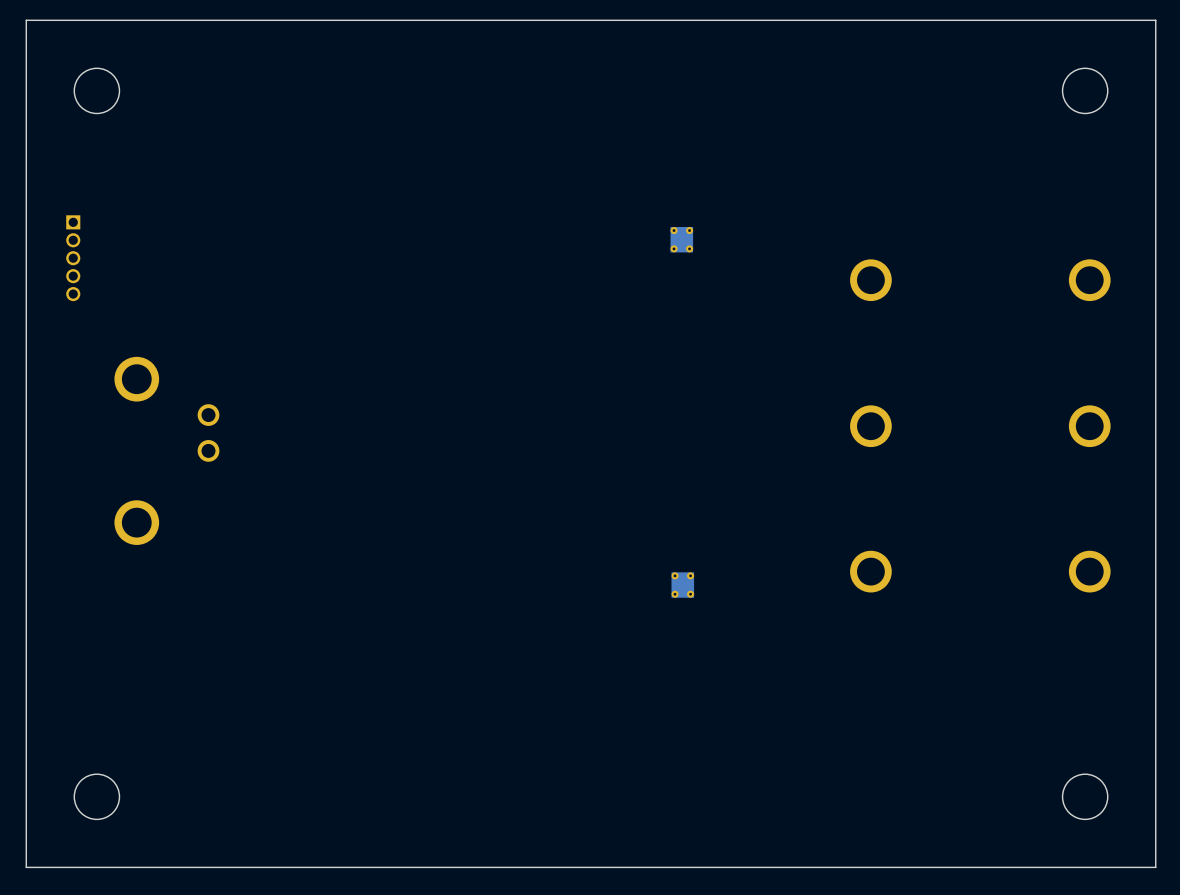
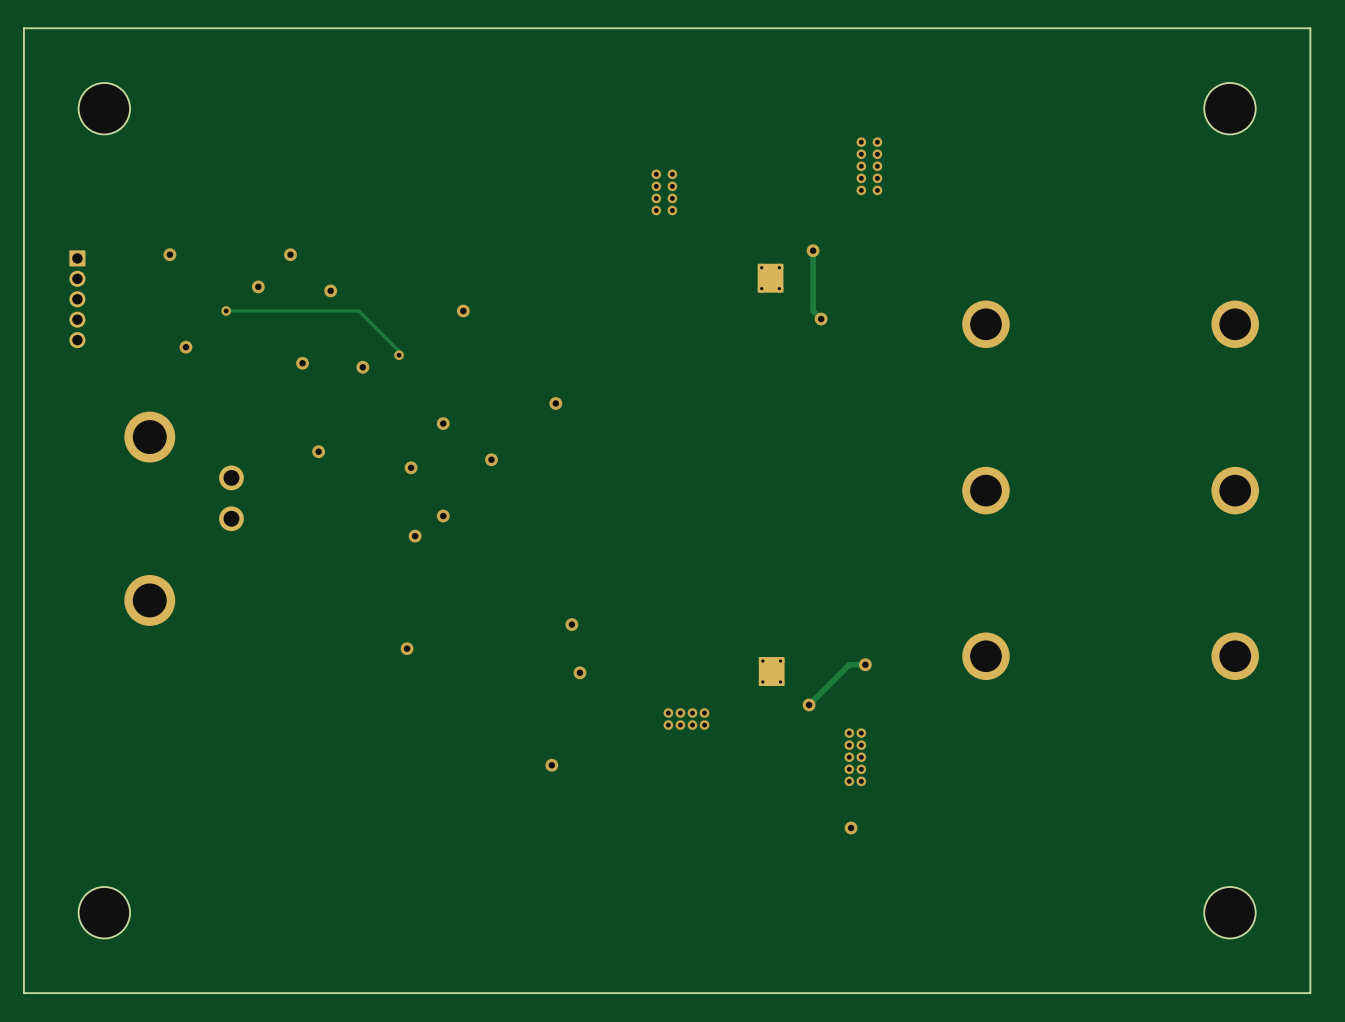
via: none -> (861, 142)
via: none -> (877, 142)
via: none -> (861, 154)
via: none -> (877, 154)
via: none -> (861, 166)
via: none -> (877, 166)
via: none -> (656, 174)
via: none -> (672, 174)
via: none -> (861, 178)
via: none -> (877, 178)
via: none -> (656, 186)
via: none -> (672, 186)
via: none -> (861, 190)
via: none -> (877, 190)
via: none -> (656, 198)
via: none -> (672, 198)
via: none -> (656, 210)
via: none -> (672, 210)
track: none -> (813, 250) (813, 310) (821, 319)
via: none -> (813, 250)
via: none -> (169, 254)
via: none -> (290, 254)
via: none -> (258, 286)
via: none -> (330, 290)
track: none -> (226, 310) (358, 310) (399, 351) (399, 355)
via: none -> (226, 310)
via: none -> (463, 310)
via: none -> (821, 319)
via: none -> (185, 347)
via: none -> (399, 355)
via: none -> (302, 363)
via: none -> (362, 367)
via: none -> (555, 403)
via: none -> (443, 423)
via: none -> (318, 451)
via: none -> (491, 459)
via: none -> (411, 467)
via: none -> (443, 516)
via: none -> (415, 536)
via: none -> (571, 624)
via: none -> (407, 648)
track: none -> (865, 664) (849, 664) (809, 704)
via: none -> (865, 664)
via: none -> (579, 672)
via: none -> (809, 704)
via: none -> (668, 713)
via: none -> (680, 713)
via: none -> (692, 713)
via: none -> (704, 713)
via: none -> (668, 725)
via: none -> (680, 725)
via: none -> (692, 725)
via: none -> (704, 725)
via: none -> (849, 733)
via: none -> (861, 733)
via: none -> (849, 745)
via: none -> (861, 745)
via: none -> (849, 757)
via: none -> (861, 757)
via: none -> (551, 765)
via: none -> (849, 769)
via: none -> (861, 769)
via: none -> (849, 781)
via: none -> (861, 781)
via: none -> (851, 827)

